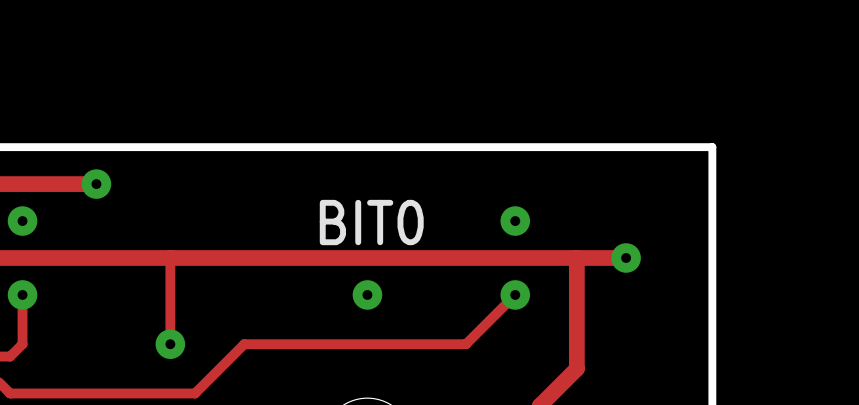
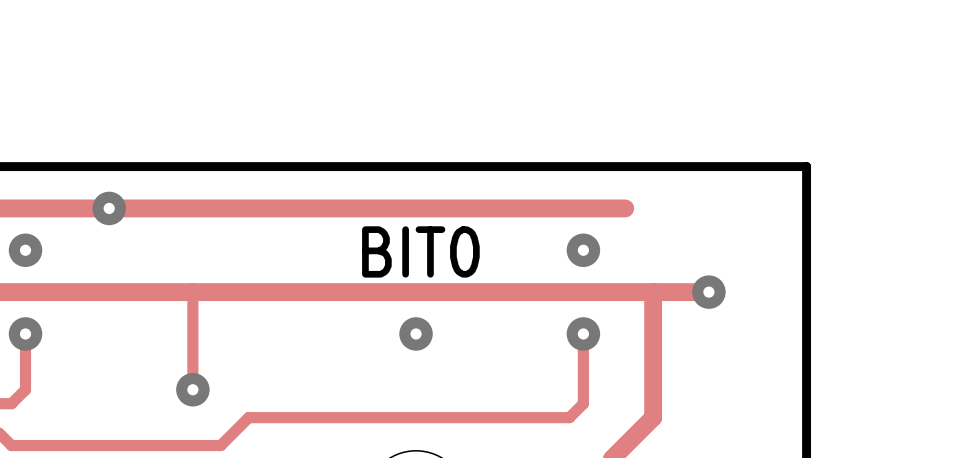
track: none -> (109, 208) (625, 208)
track: (515, 294) (465, 344) (244, 344) (219, 368) -> (583, 333) (583, 403) (569, 417) (248, 417)

